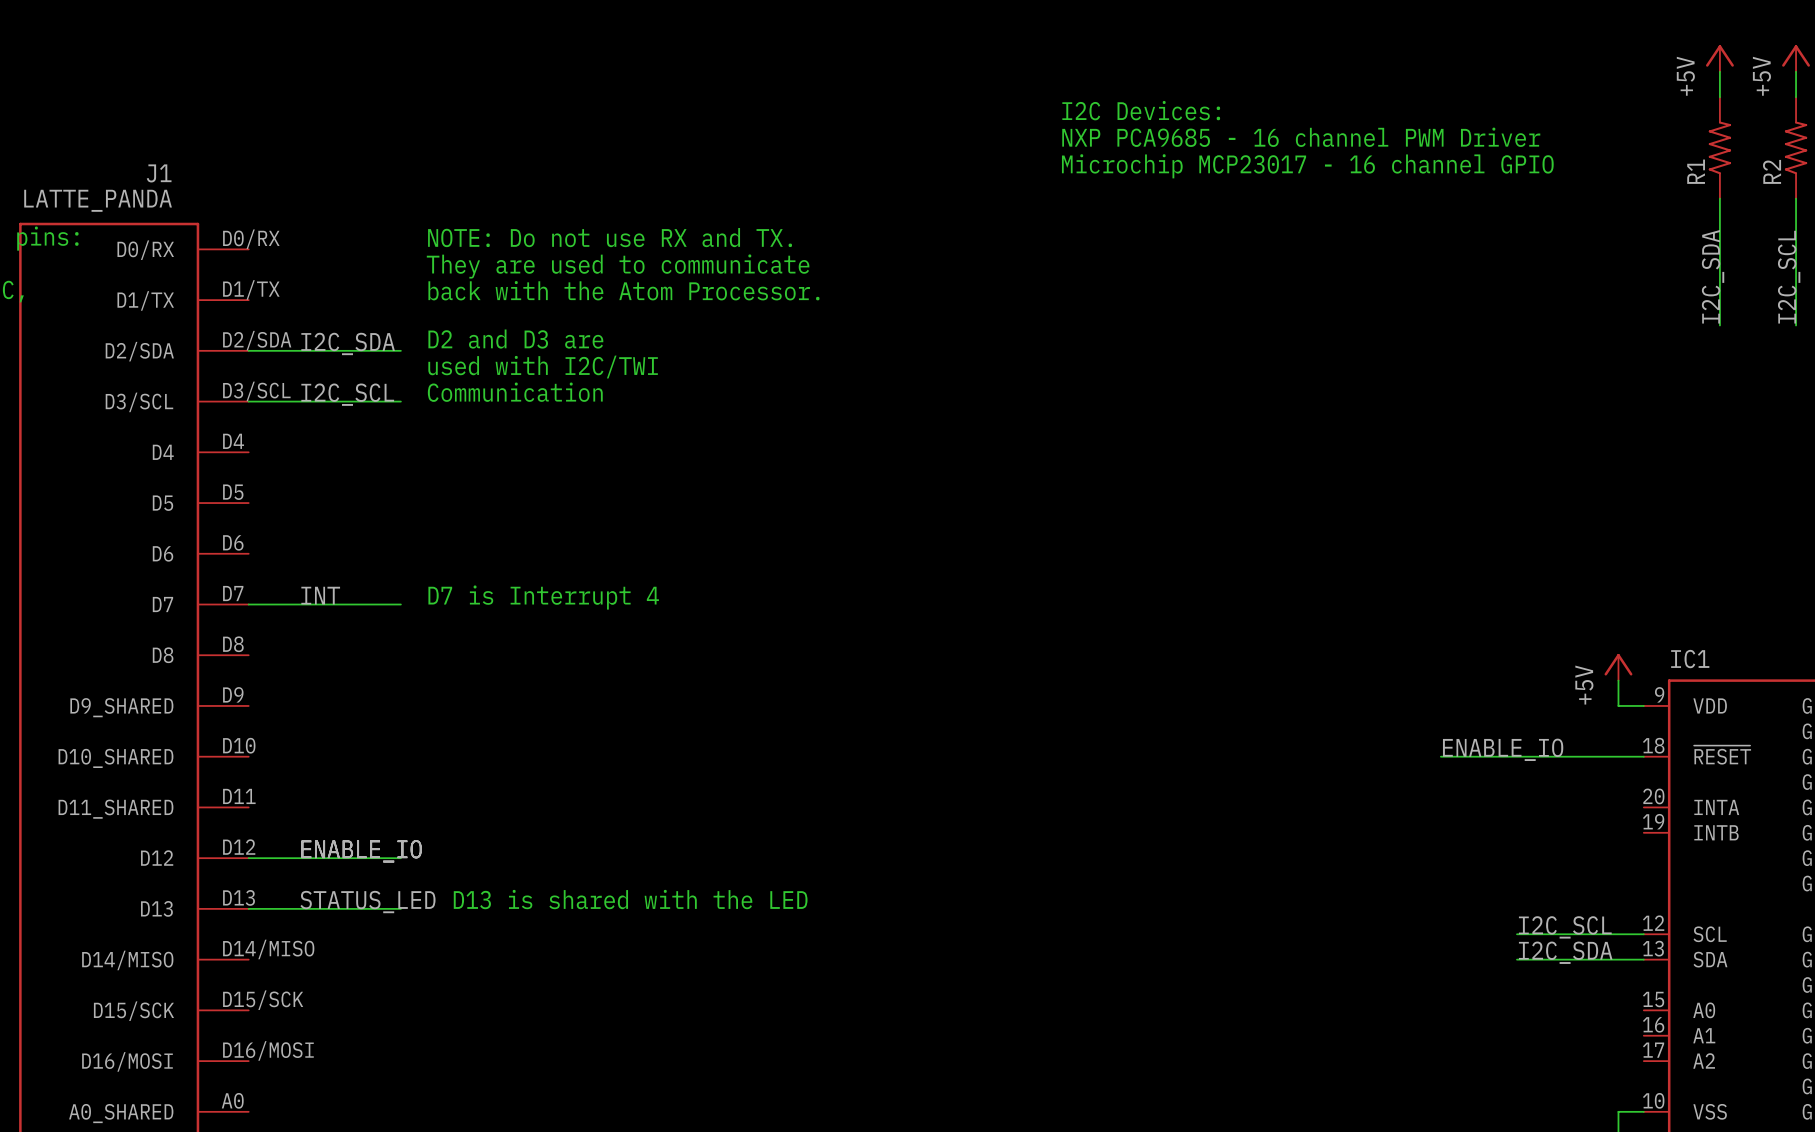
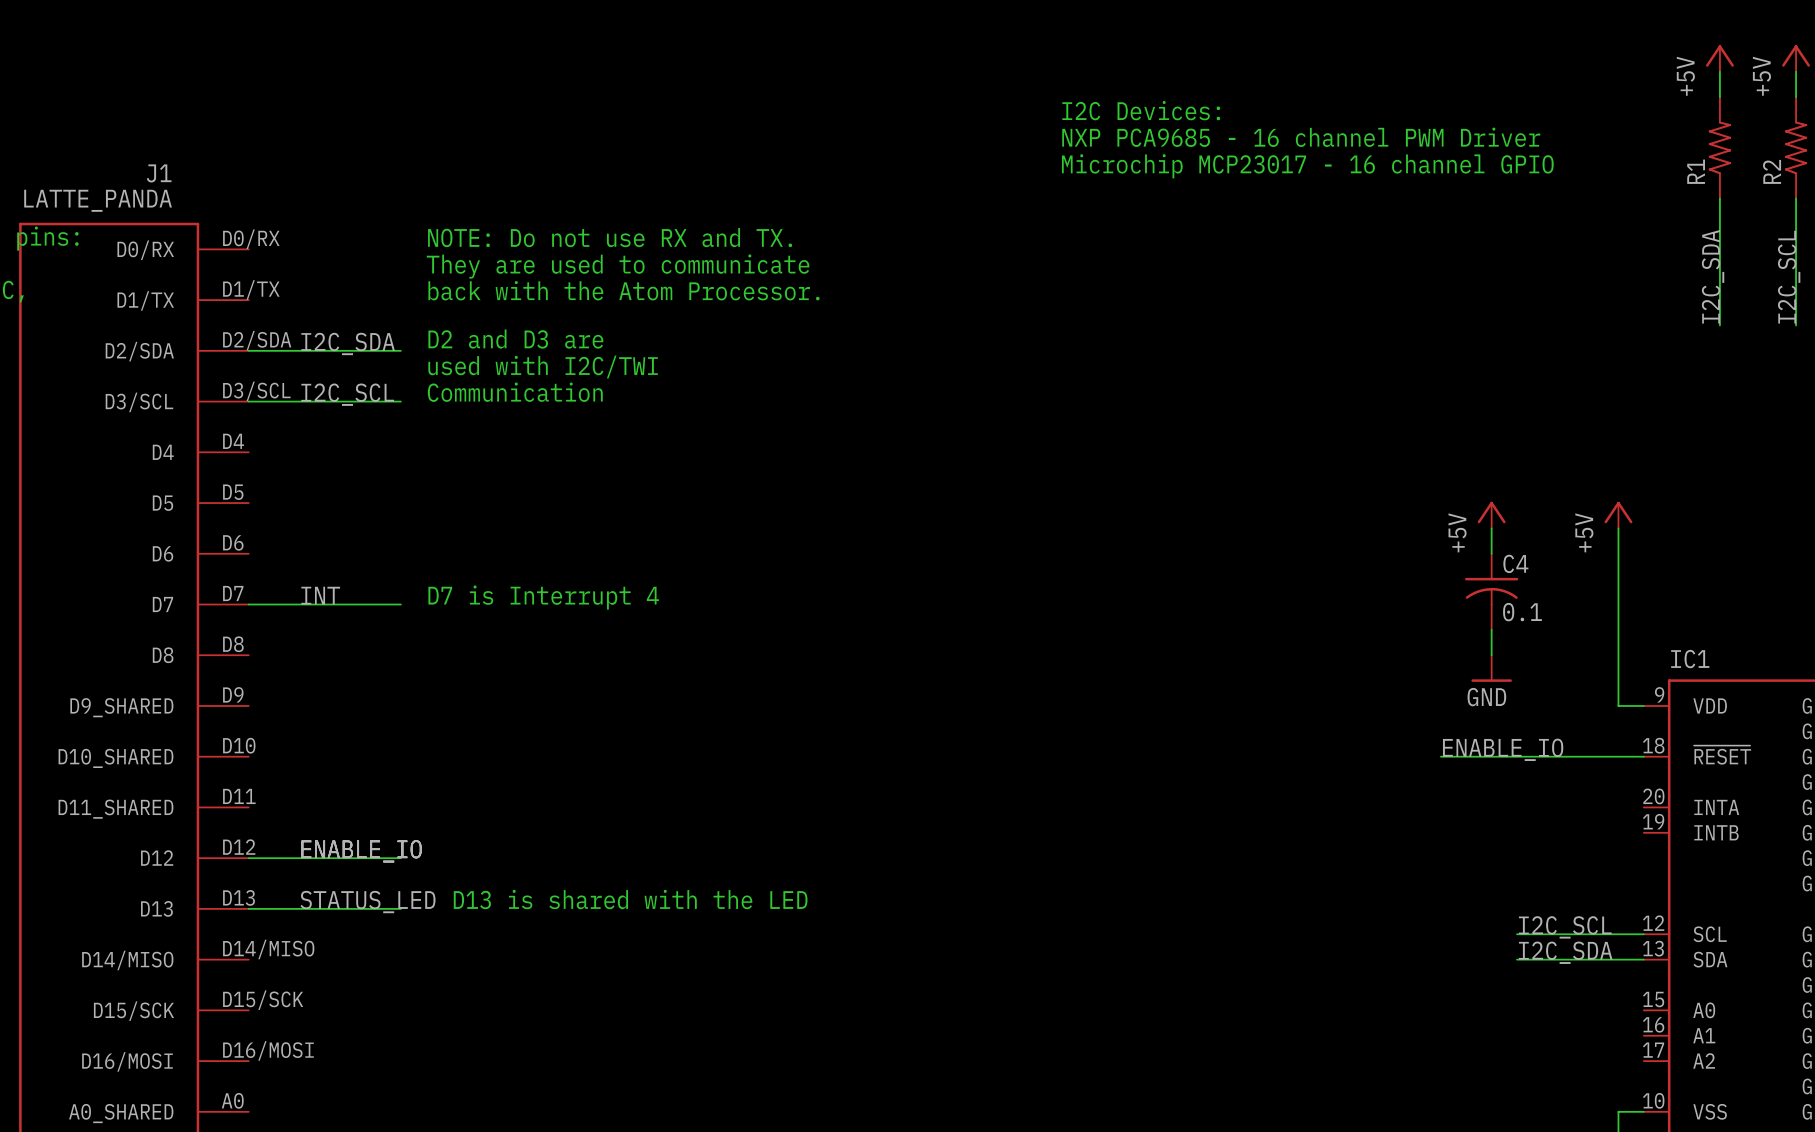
power symbol: none -> +5V (1491, 515)
power symbol: none -> +5V (1618, 515)
wire: none -> (1491, 528) (1491, 553)
wire: none -> (1618, 528) (1618, 680)
C4: none -> 0.1 (1491, 591)
wire: none -> (1491, 629) (1491, 655)
power symbol: +5V (1618, 667) -> none
power symbol: none -> GND (1491, 668)

